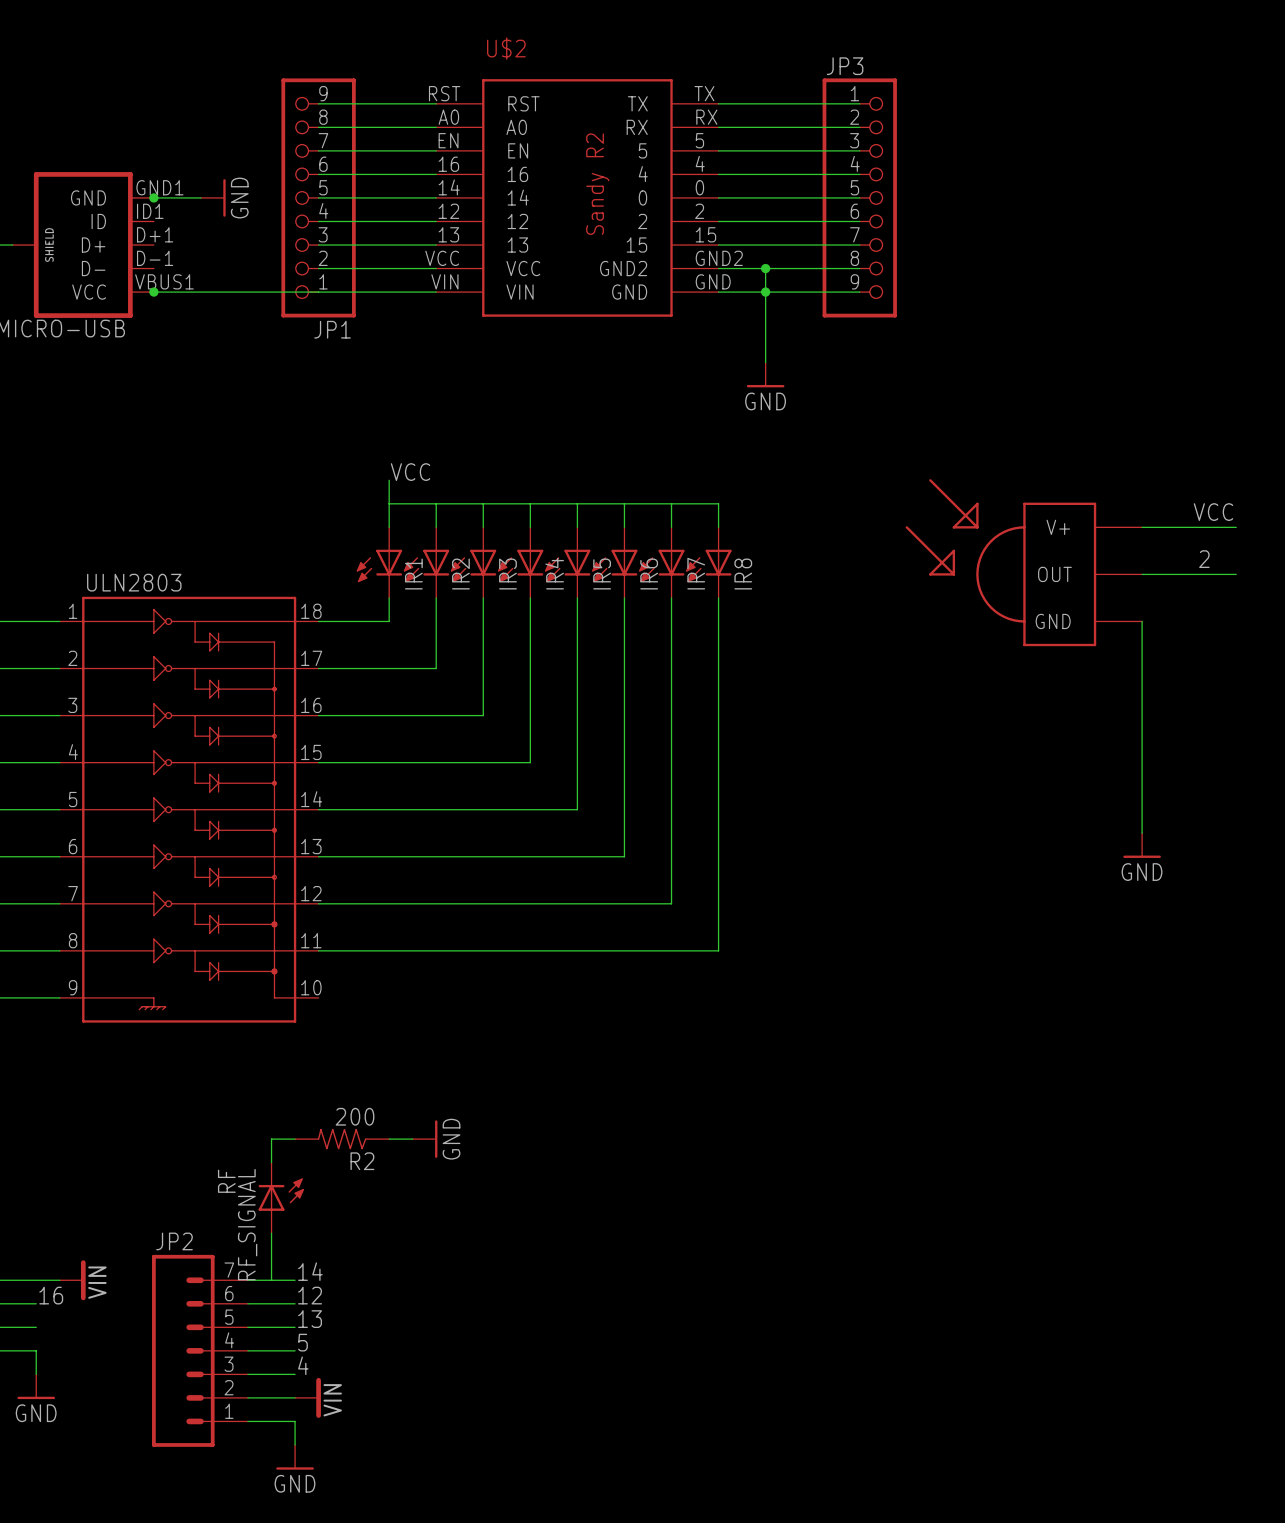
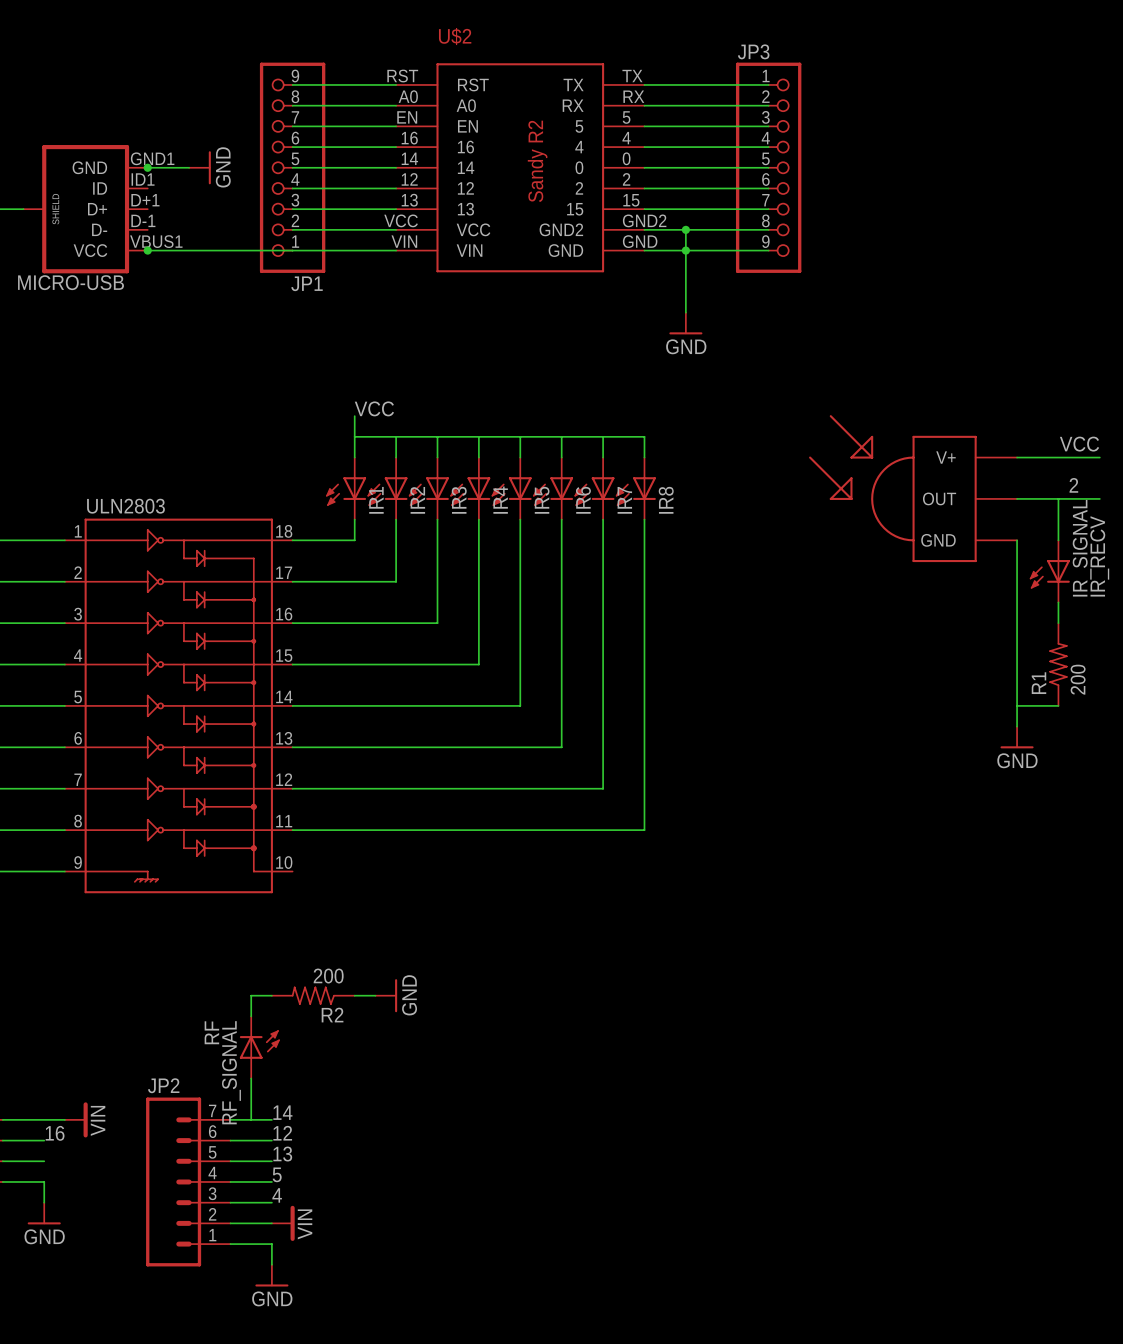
wire: none -> (1058, 498) (1058, 540)
IR_SIGNAL: none -> IR_RECV (1049, 571)
wire: none -> (1058, 602) (1058, 623)
R1: none -> 200 (1058, 664)
wire: none -> (1017, 705) (1058, 705)

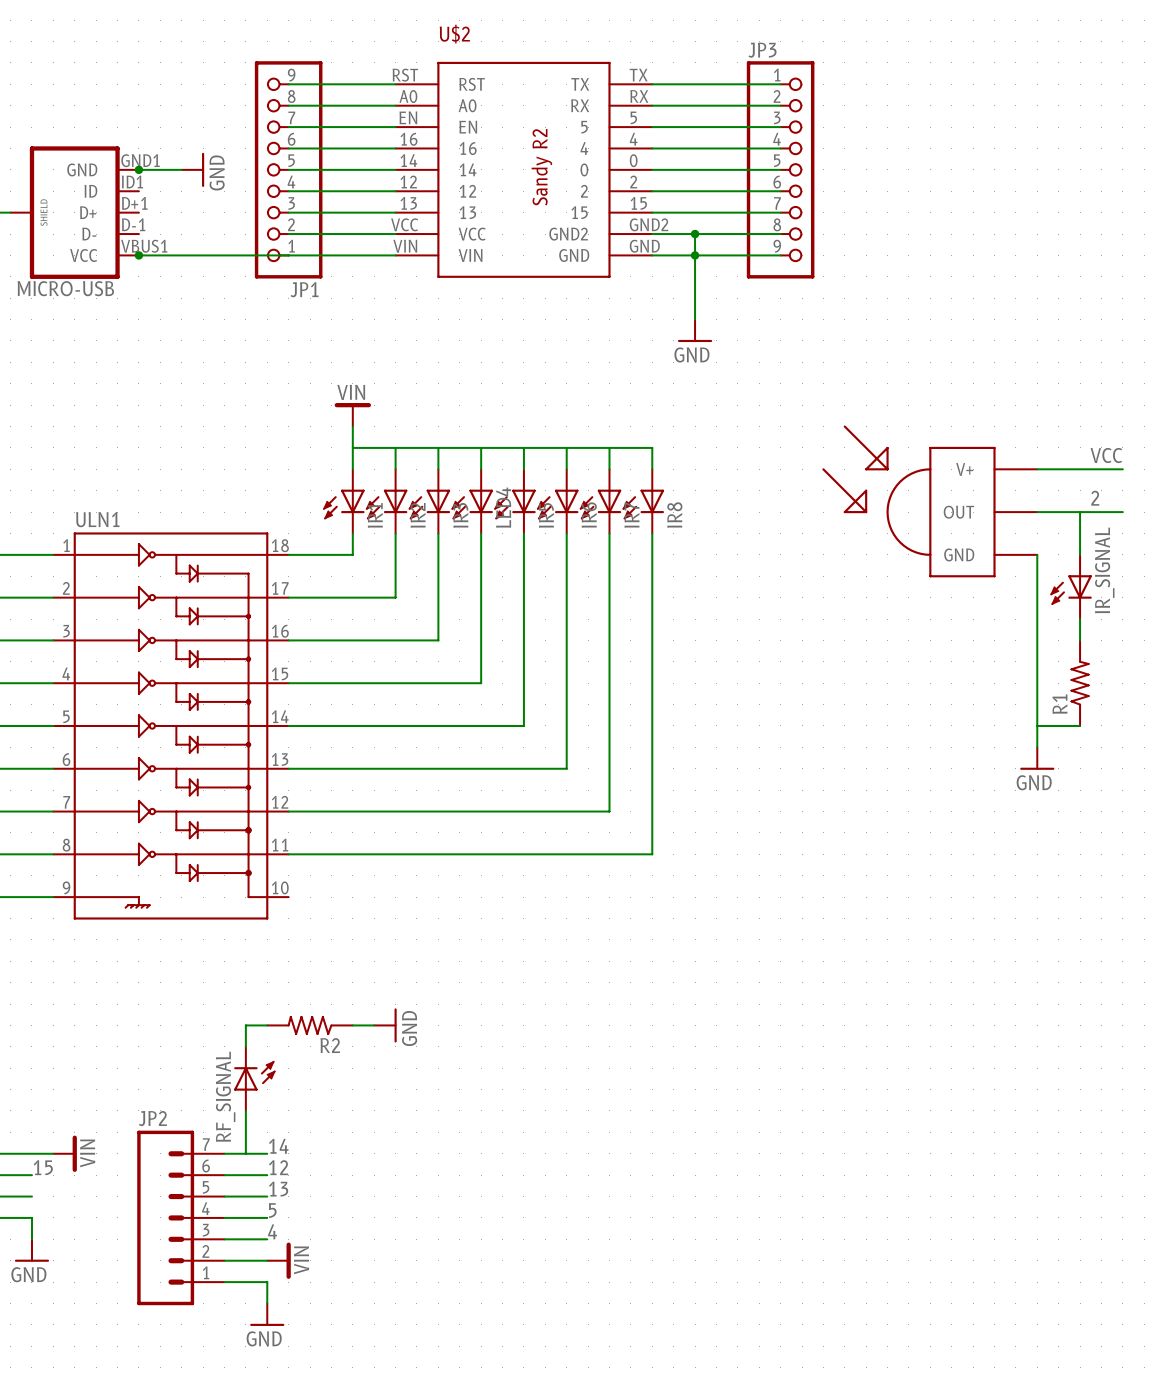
power symbol: none -> VIN (352, 414)
label: VCC (374, 408) -> none
IR4 name: IR4 (500, 500) -> LED4 (503, 507)
ULN2803 name: ULN2803 (125, 506) -> ULN1 (97, 519)
IR_SIGNAL value: IR_RECV (1099, 556) -> none
R1 value: 200 (1078, 679) -> none
R2 value: 200 (328, 976) -> none
RF_SIGNAL value: RF (211, 1032) -> none
label: 16 (55, 1133) -> 15 (43, 1167)

